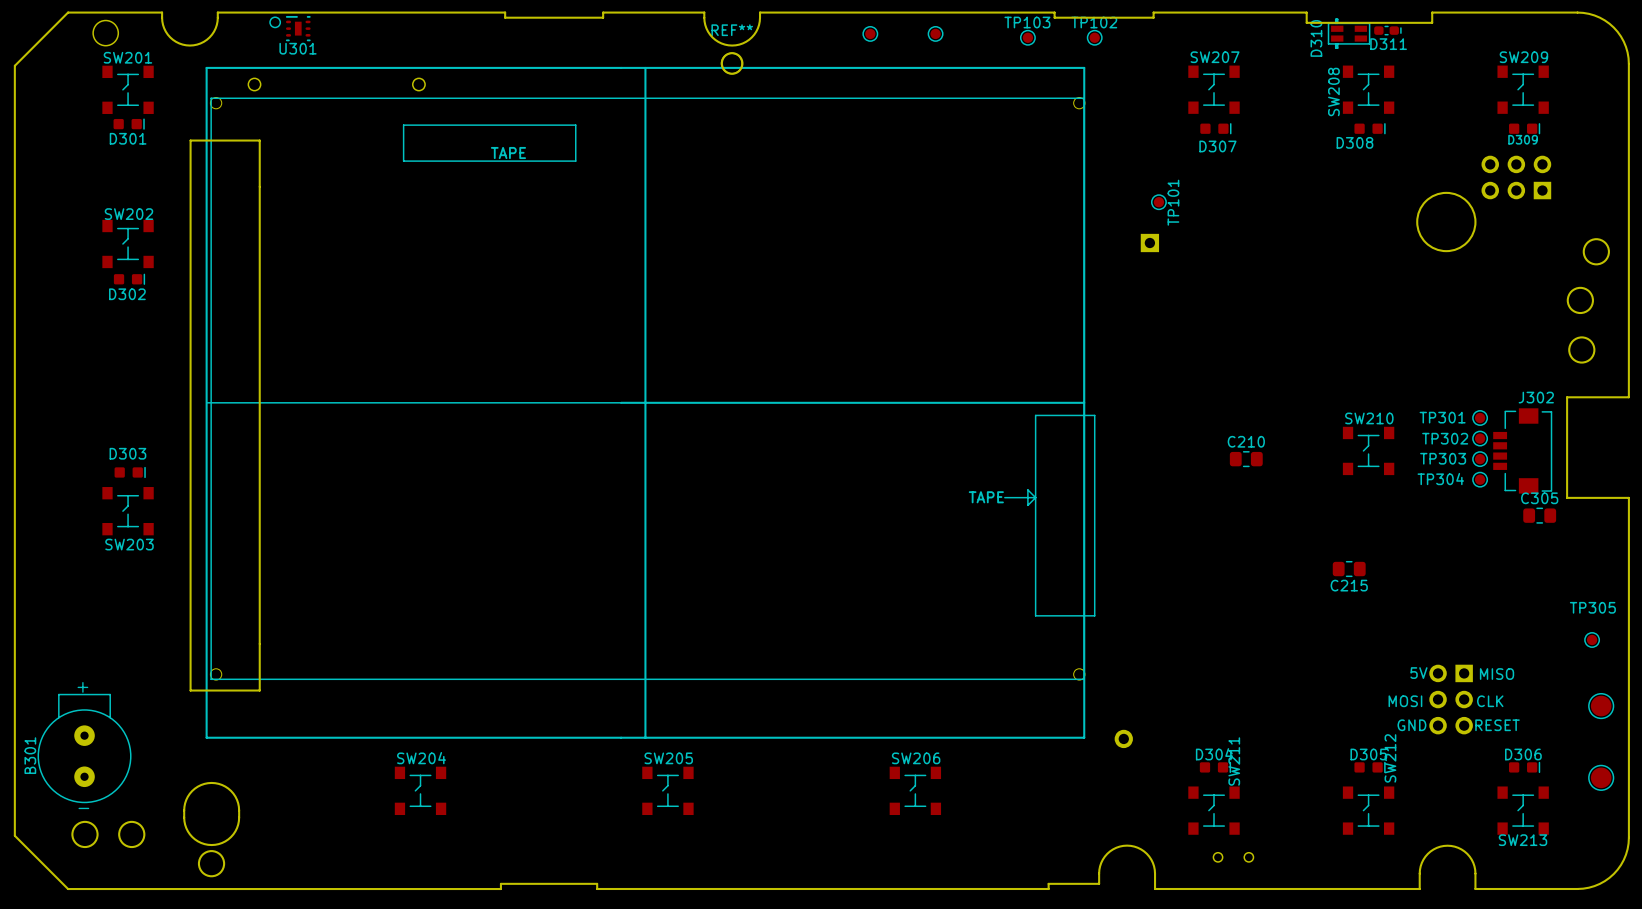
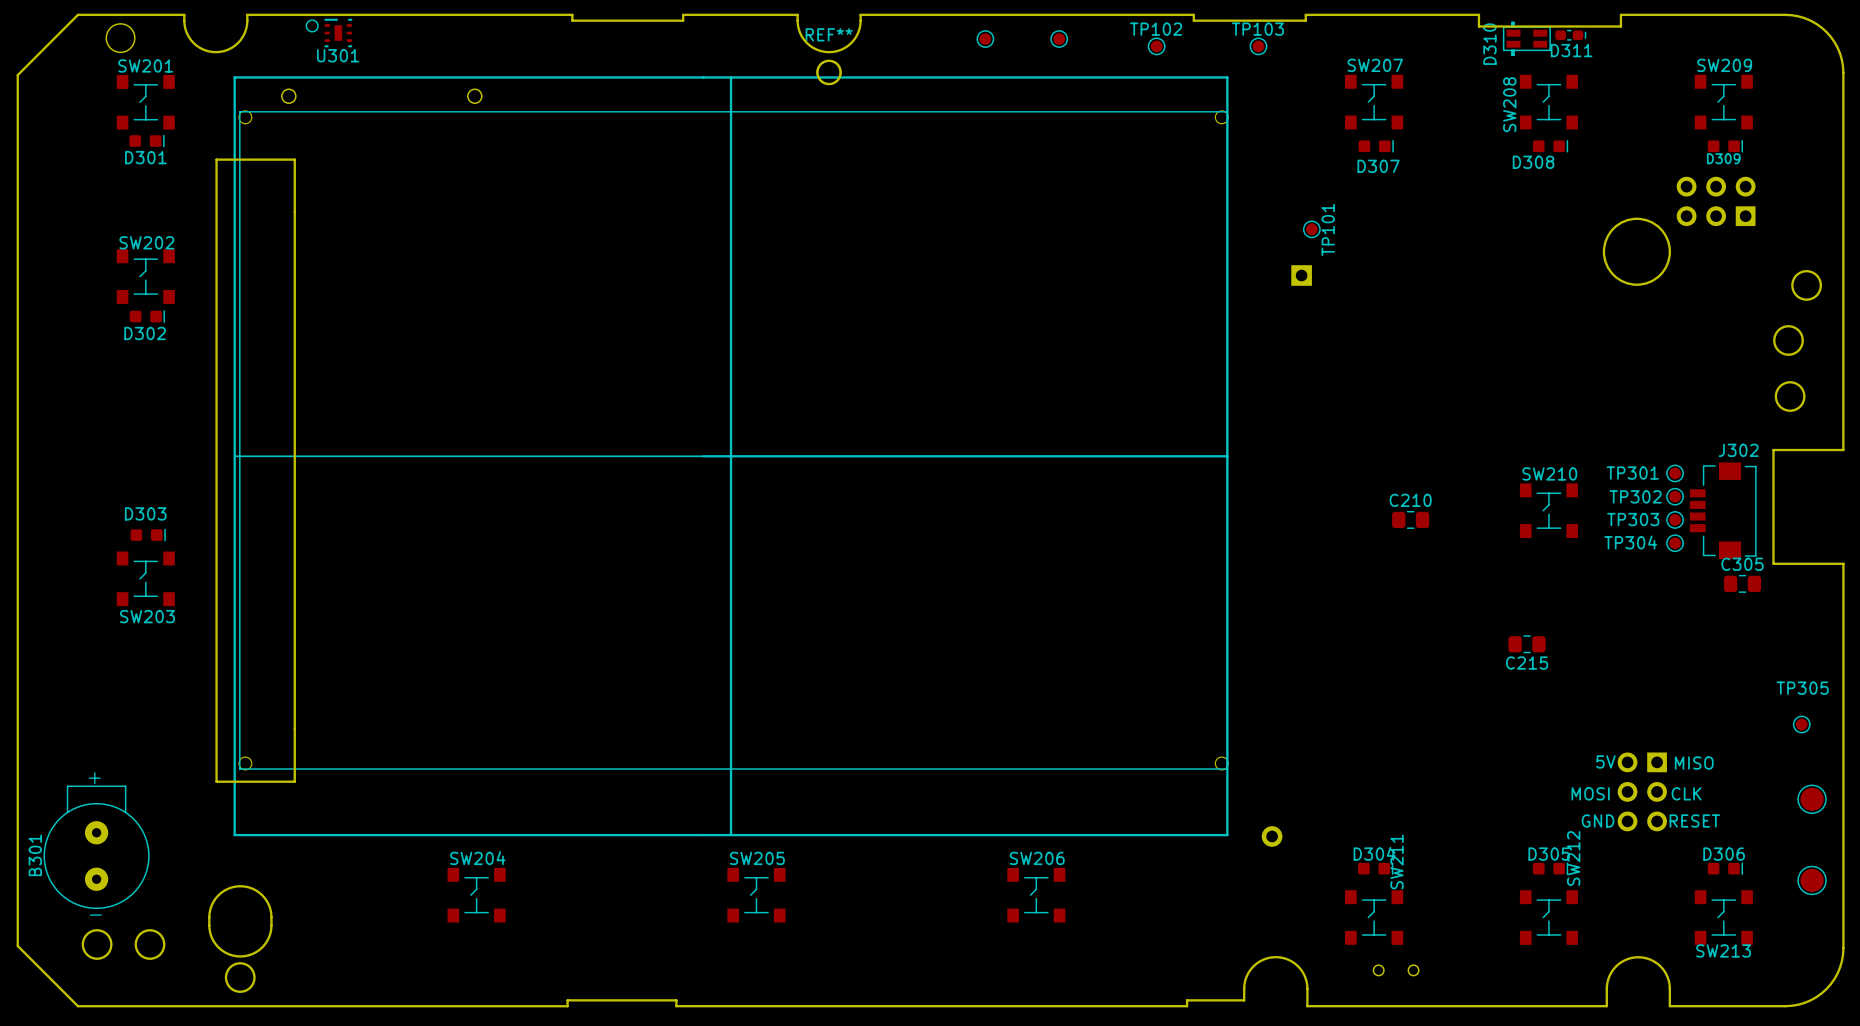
TP103 position: (1027, 37) -> (1258, 46)
TP102 position: (1094, 37) -> (1156, 46)
line: (403, 125) (575, 125) (575, 161) (403, 161) (403, 125) -> none
text: TAPE (508, 153) -> none
line: (1035, 415) (1094, 415) (1094, 615) (1035, 615) (1035, 415) -> none
text: TAPE (986, 497) -> none
line: (1004, 497) (1035, 497) -> none
line: (1035, 497) (1027, 505) (1027, 489) (1035, 497) -> none

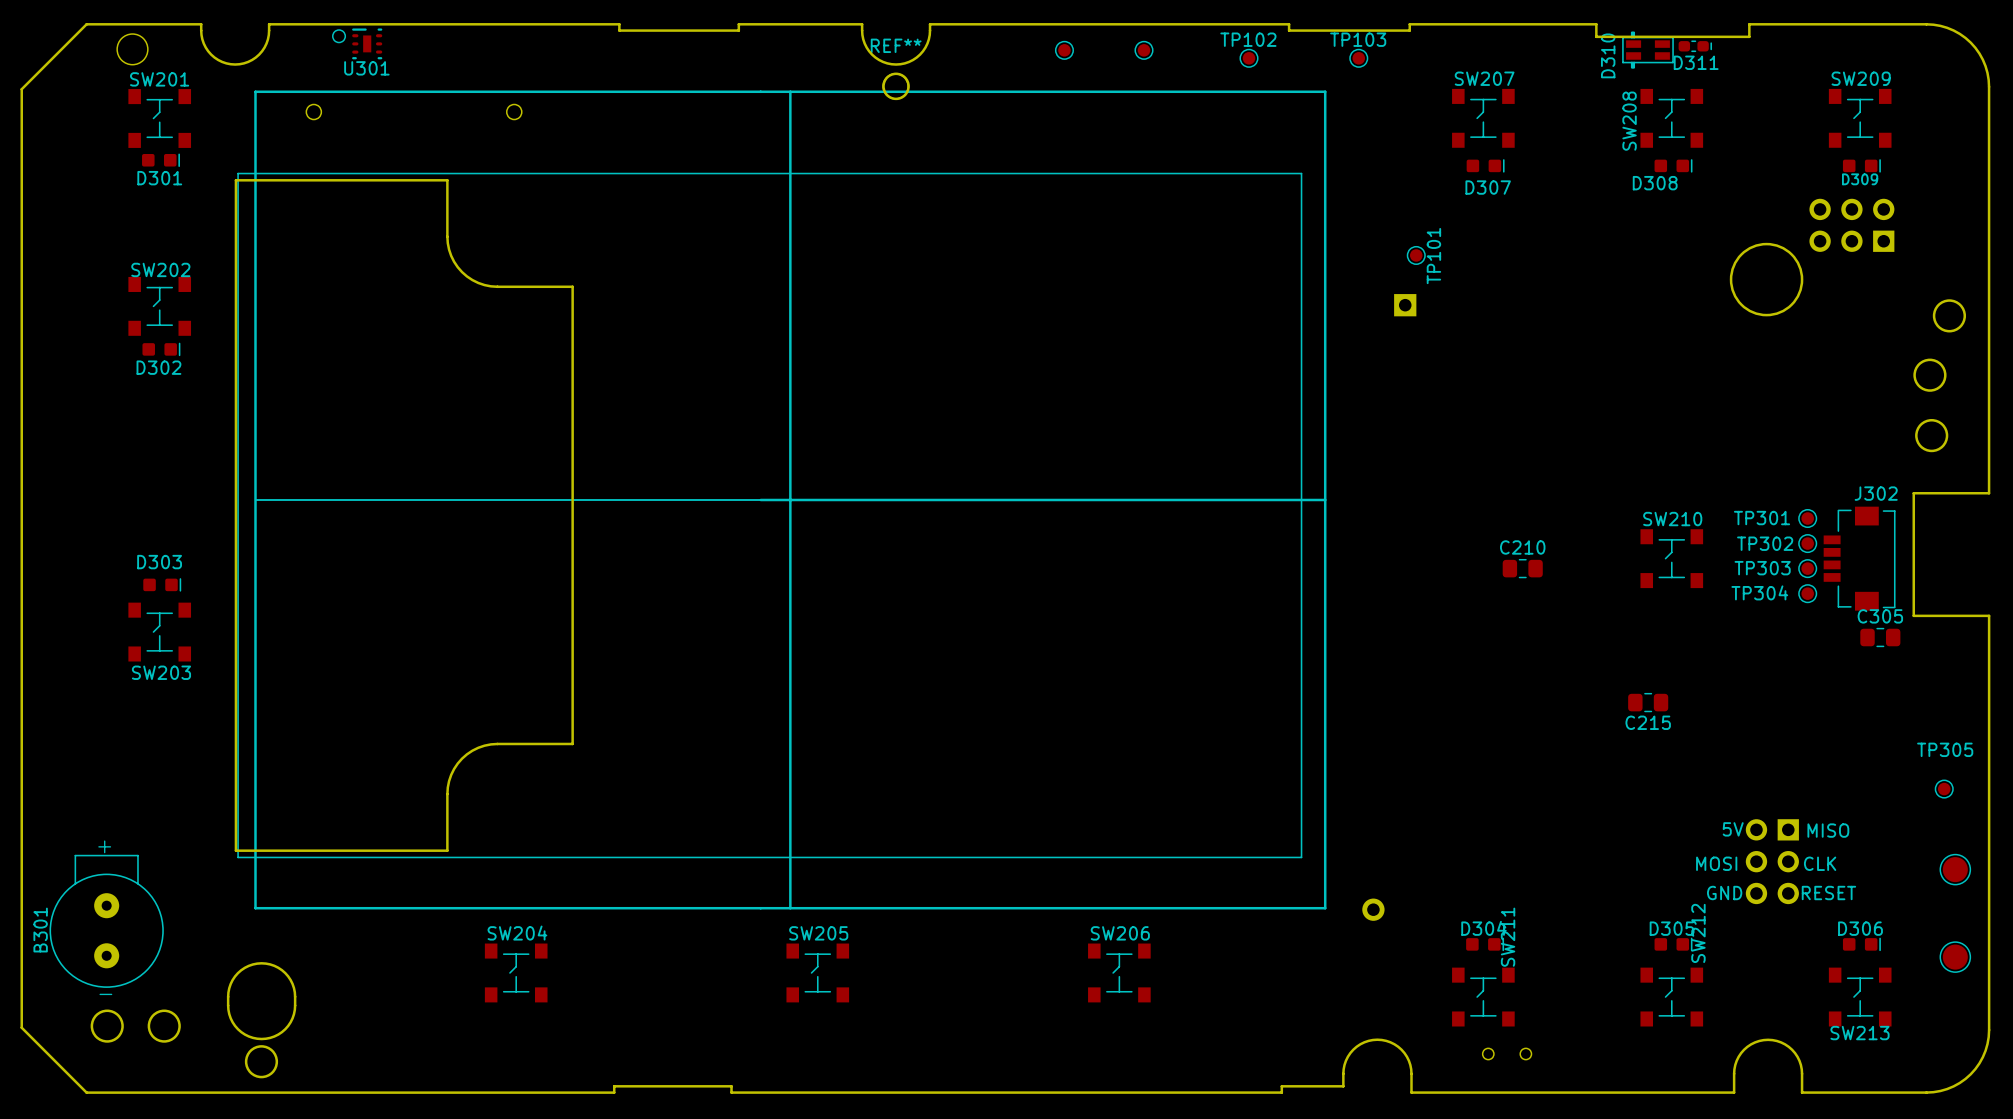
board edge: (294, 159) (294, 781) -> (320, 180) (447, 180) (449, 249) (457, 267) (466, 276) (478, 282) (490, 286) (572, 286) (572, 743) (490, 744) (478, 747) (466, 754) (457, 763) (449, 781) (447, 850) (320, 850)
part: (733, 440) -> none
part: none -> (769, 515)

